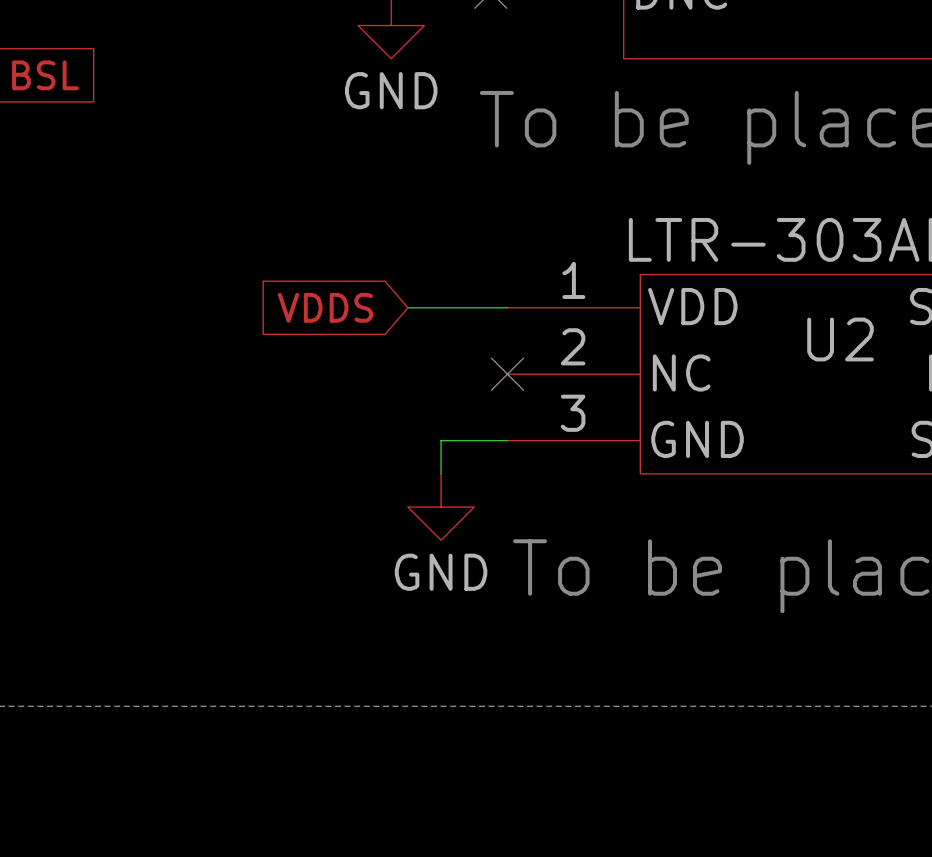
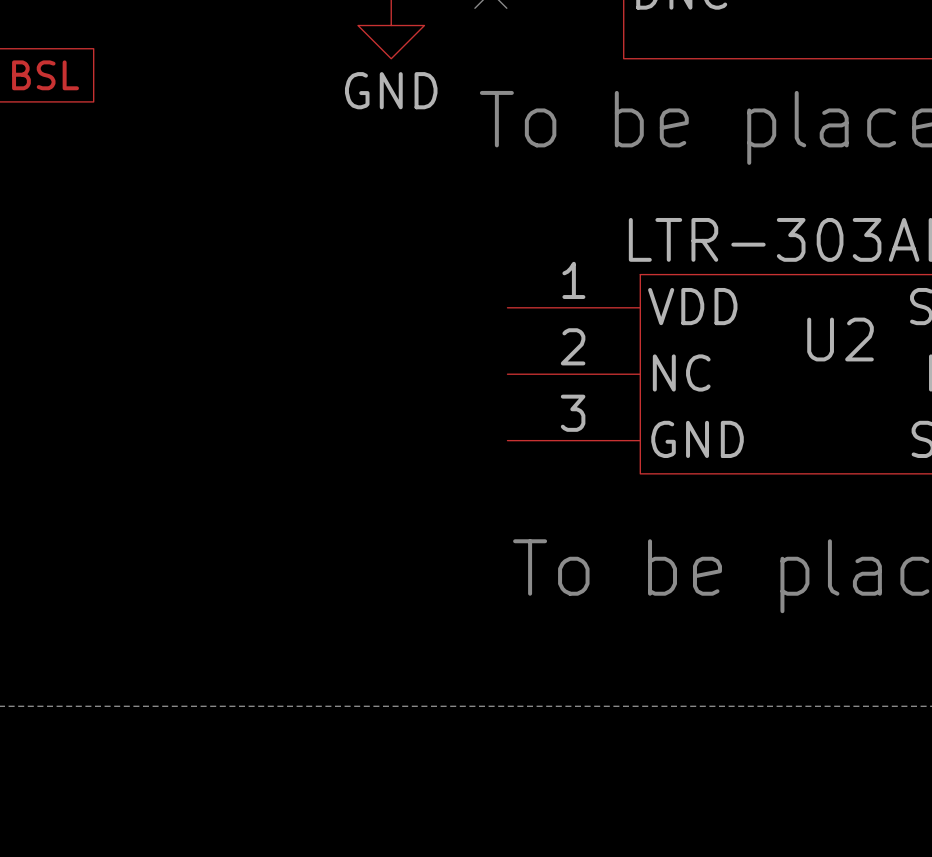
global label: VDDS (325, 307) -> none
wire: (407, 307) (507, 307) -> none
no-connect mark: (507, 374) -> none
wire: (507, 440) (441, 440) (441, 473) -> none
power symbol: GND (441, 507) -> none

